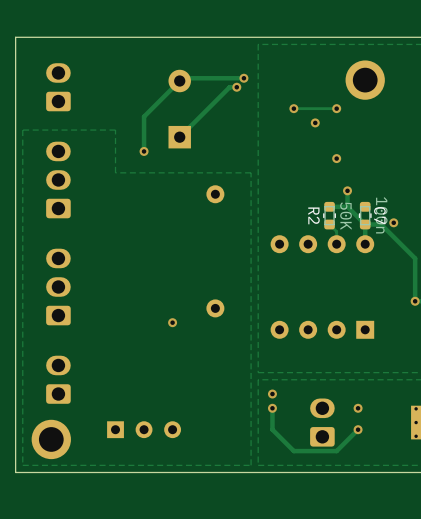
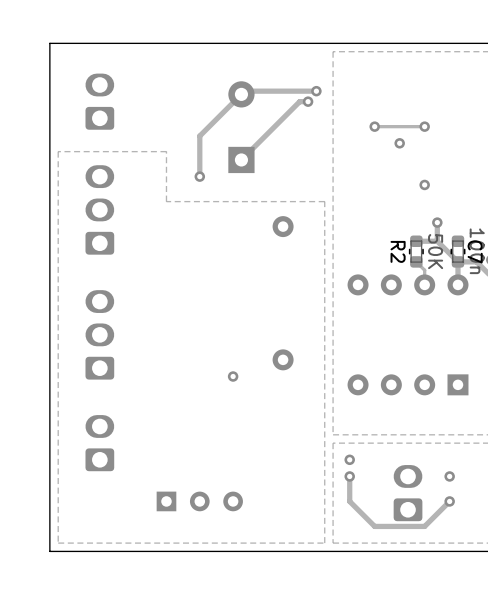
part: (365, 80) -> none
part: (51, 439) -> none

